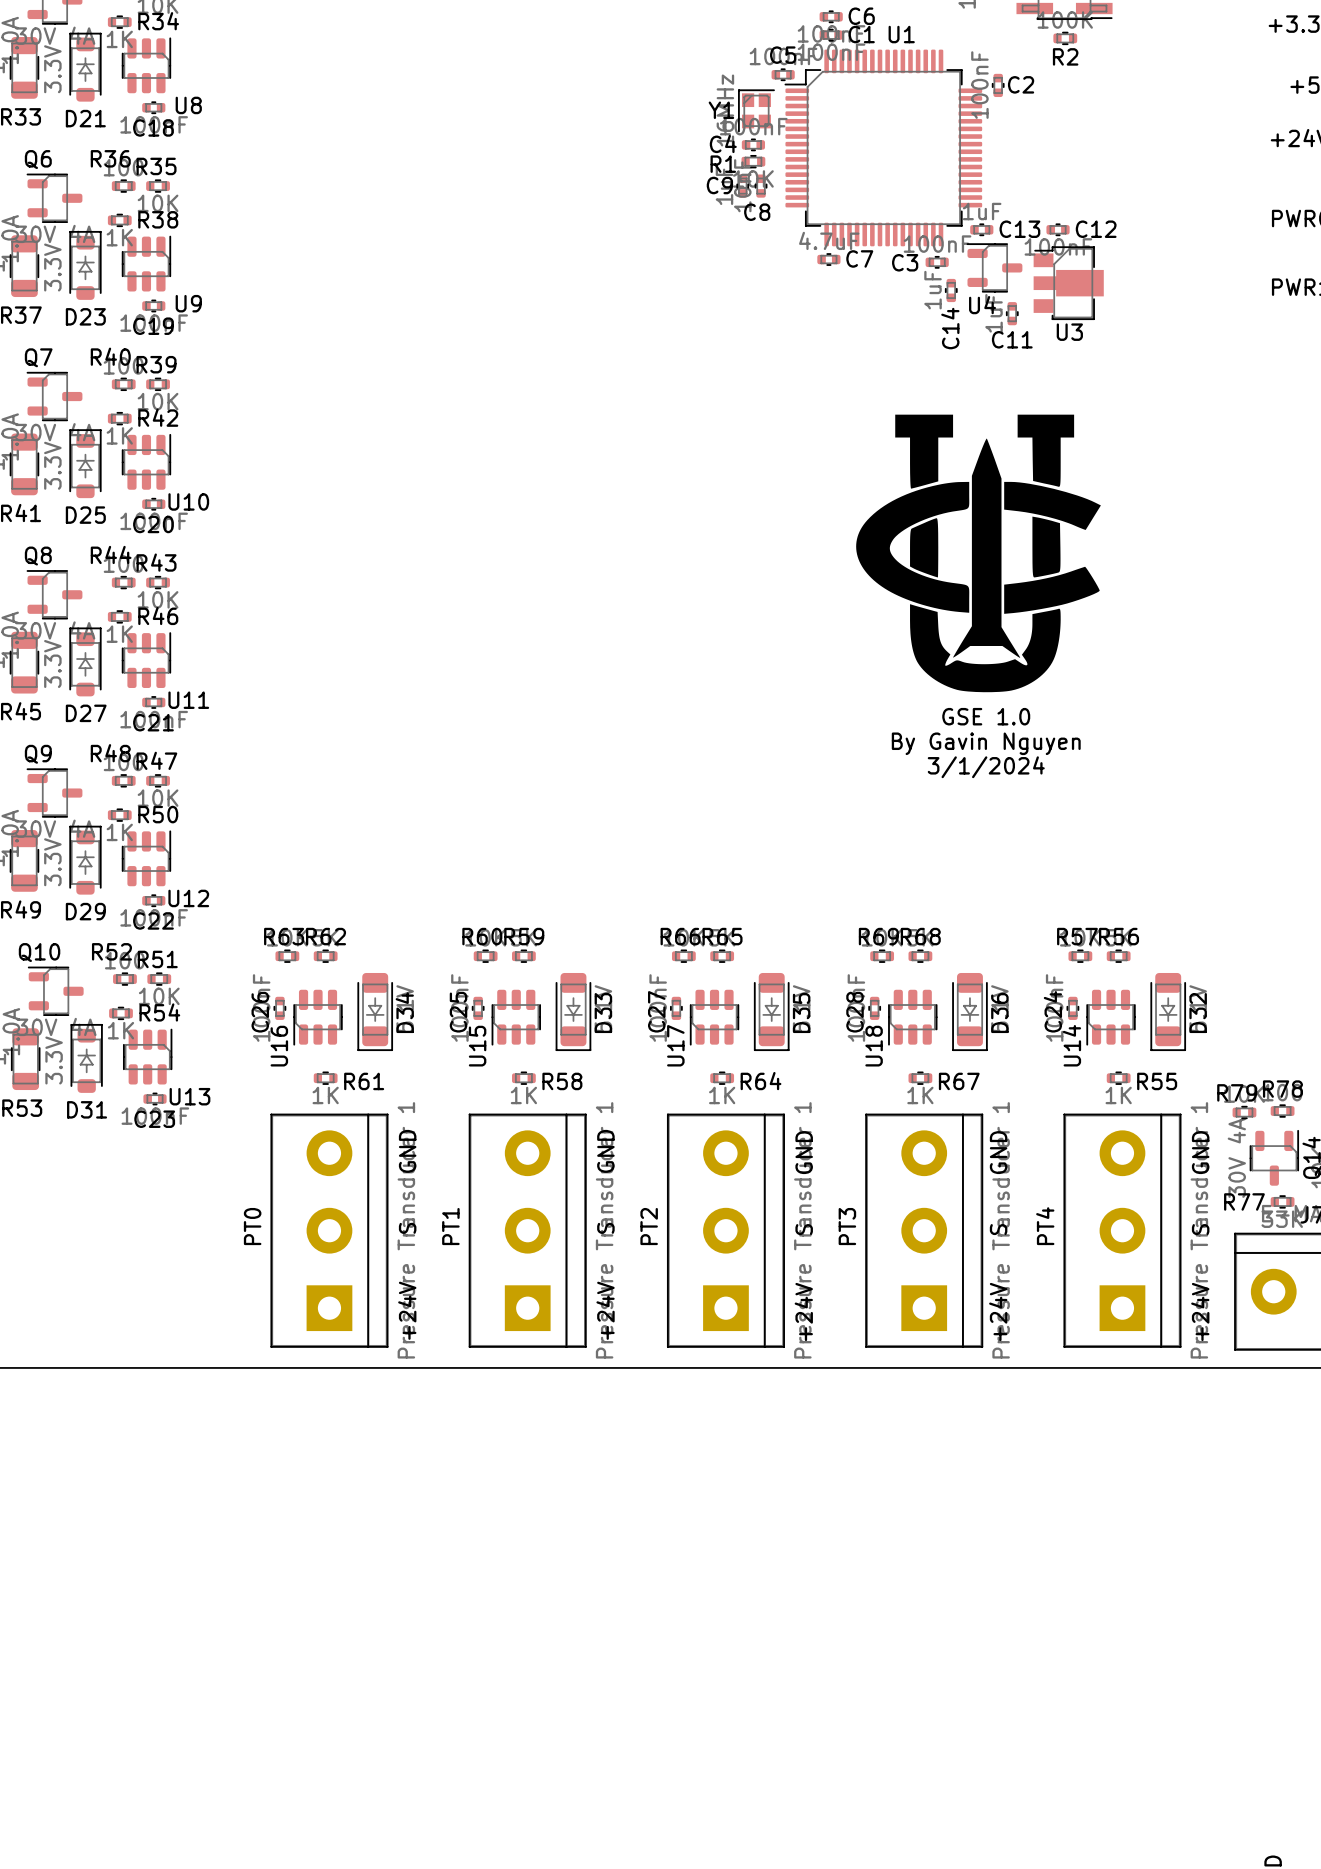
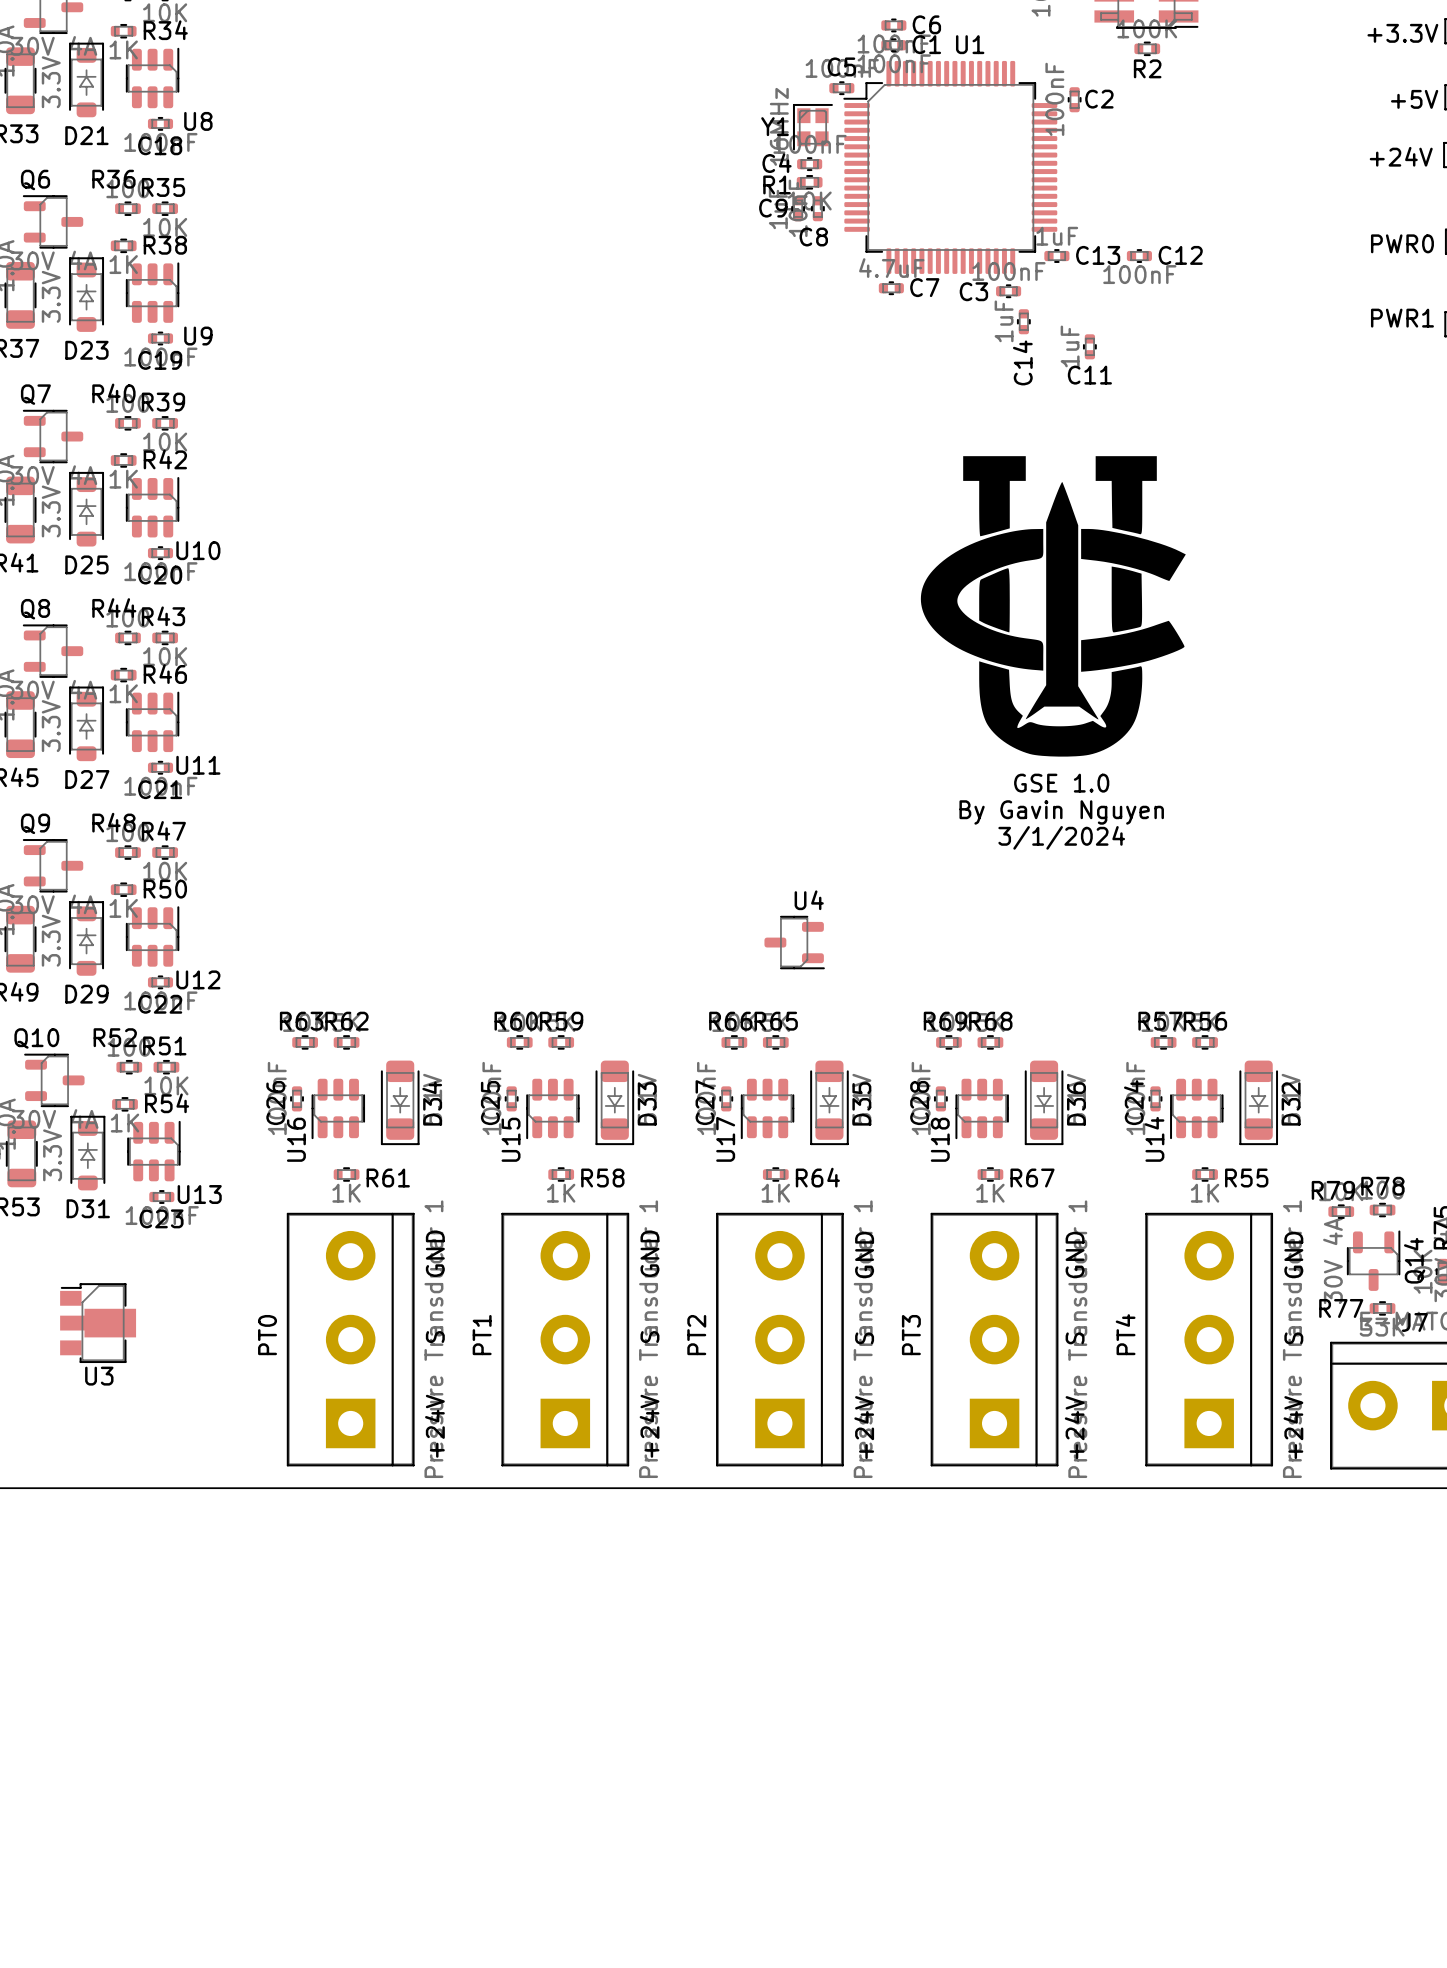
U4 rotation: 0° (994, 267) -> 180° (794, 942)
U4 position: (994, 267) -> (794, 942)
U3 position: (1068, 283) -> (98, 1323)

